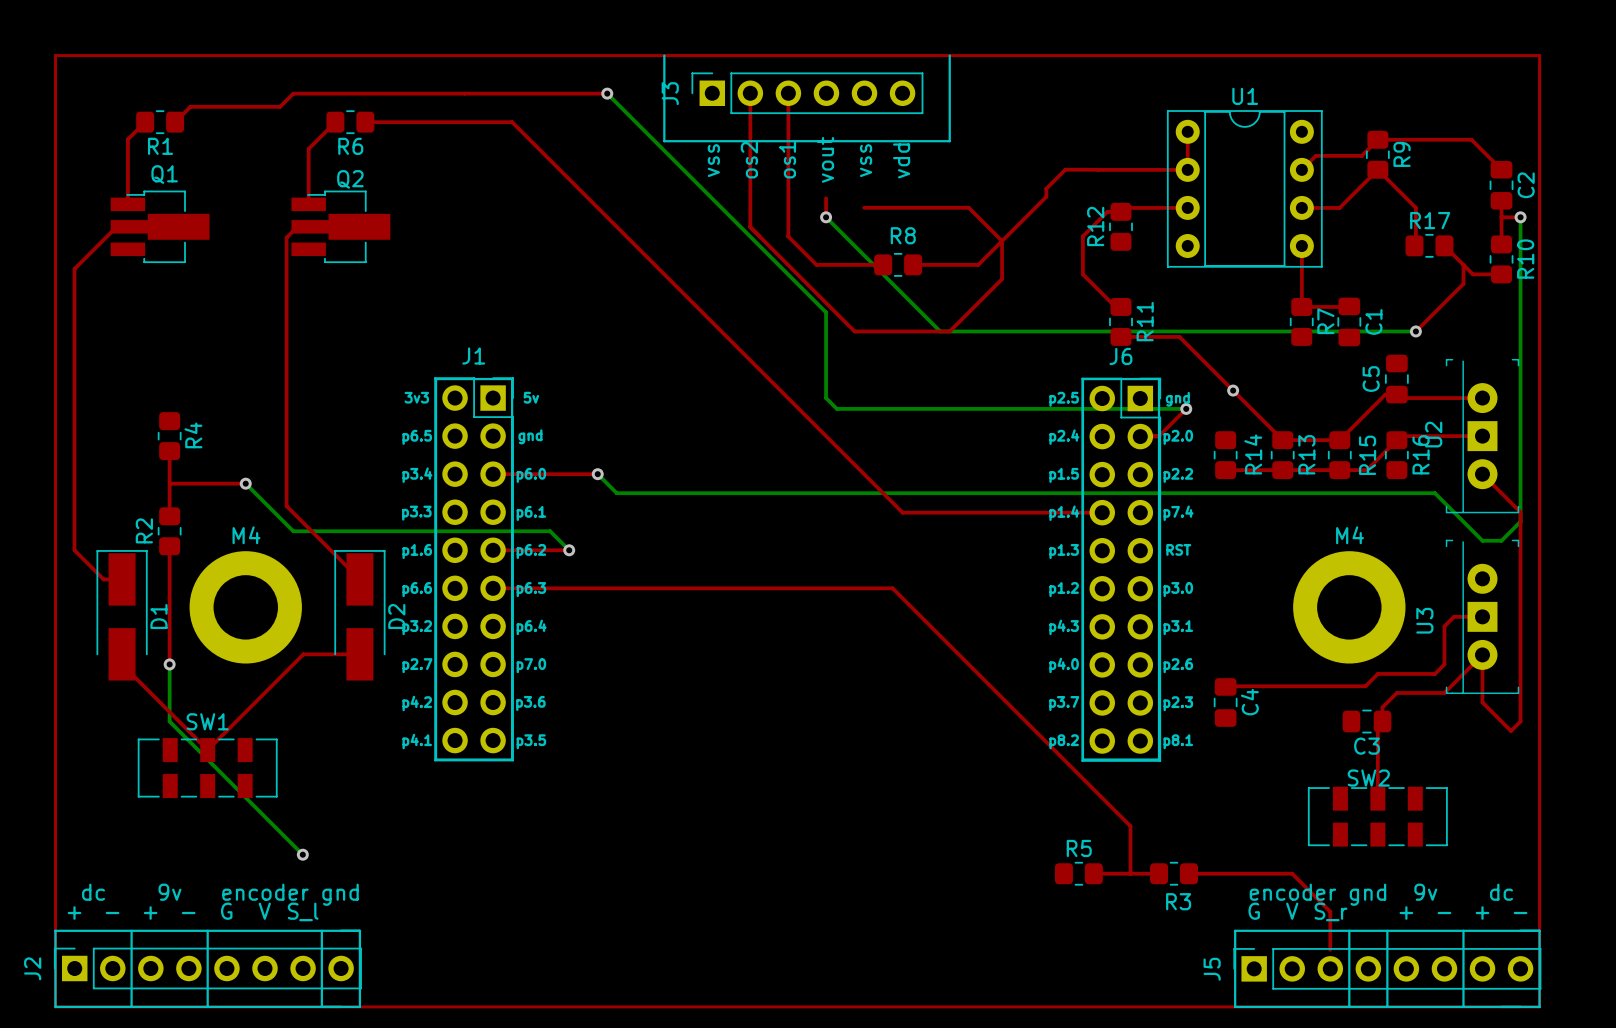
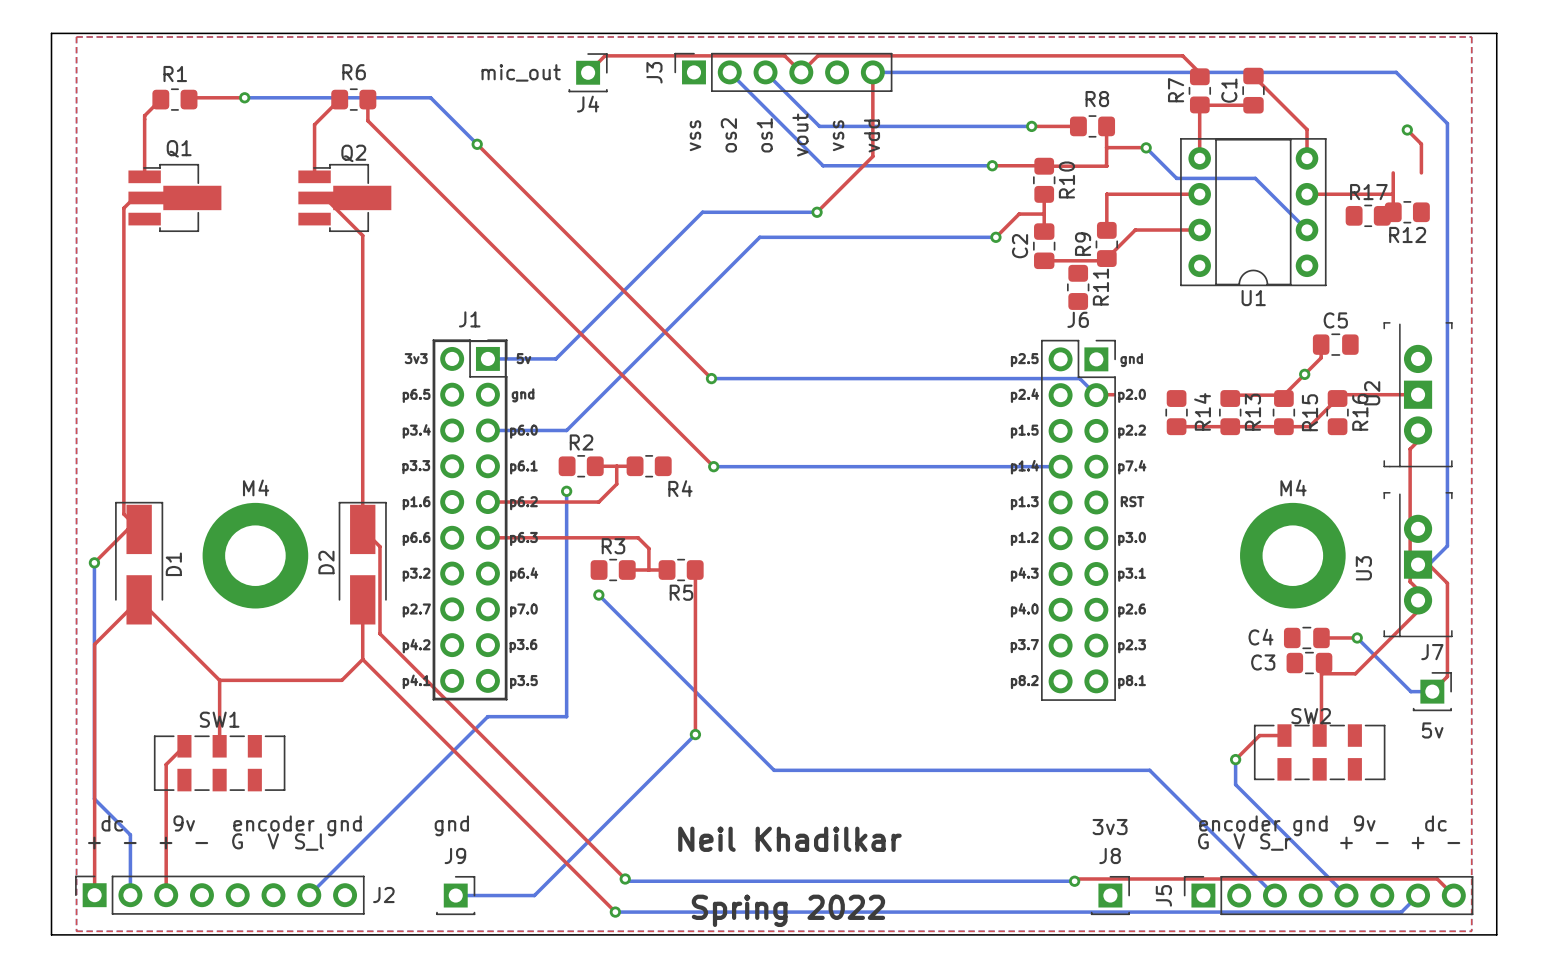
board edge: none -> (51, 33) (1496, 33) (1496, 934) (51, 934) (51, 33)
top track: (55, 55) (1539, 55) (1539, 1006) (55, 1006) (55, 55) -> none
line: (664, 55) (664, 141) (949, 141) (949, 55) -> none
text: none -> mic_out (521, 72)
top track: none -> (588, 72) (605, 55) (784, 55) (801, 72) (817, 55) (1182, 55) (1199, 72) (1199, 76)
J4: none -> (588, 72)
top track: (607, 93) (293, 93) (280, 106) (190, 106) (175, 122) -> none
bottom track: (607, 93) (826, 312) (826, 398) (836, 408) (1187, 407) -> none
via: (607, 93) -> none
top track: (750, 93) (750, 227) -> none
bottom track: none -> (729, 72) (823, 165) (992, 165)
top track: (788, 93) (788, 236) (816, 264) (883, 264) -> none
bottom track: none -> (765, 72) (819, 126) (1031, 126)
top track: none -> (872, 72) (872, 156) (817, 212)
bottom track: none -> (872, 72) (1396, 72) (1447, 123) (1447, 545) (1428, 564)
top track: none -> (1253, 76) (1307, 129) (1307, 158)
top track: none -> (194, 97) (244, 97)
bottom track: none -> (244, 97) (430, 97) (477, 144)
via: none -> (244, 97)
top track: (365, 122) (512, 122) (902, 512) (1102, 512) -> (367, 99) (367, 120) (713, 466)
top track: none -> (1199, 104) (1253, 105)
top track: none -> (1199, 105) (1199, 158)
top track: (1187, 131) (1187, 169) (1098, 169) -> none
R1 name position: R1 (160, 146) -> R1 (175, 74)
R6 name position: R6 (350, 146) -> R6 (354, 72)
top track: none -> (1031, 126) (1078, 126)
via: none -> (1031, 126)
top track: none -> (1106, 126) (1106, 166) (992, 165)
R9 position: (1377, 154) -> (1106, 244)
R9 name position: R9 (1402, 154) -> R9 (1083, 244)
top track: none -> (1407, 129) (1421, 144) (1421, 172)
top track: none -> (477, 144) (711, 378)
via: none -> (477, 144)
top track: (1097, 169) (1065, 169) (1046, 188) (1046, 196) (978, 264) (913, 264) -> none
top track: (1501, 169) (1471, 139) (1377, 139) (1361, 155) (1315, 155) (1301, 169) -> none
top track: none -> (1106, 147) (1146, 147)
bottom track: none -> (1146, 147) (1176, 178) (1255, 178) (1307, 230)
via: none -> (1146, 147)
C2 position: (1501, 185) -> (1044, 246)
C2 name position: C2 (1526, 185) -> C2 (1020, 246)
U1 rotation: 0° (1244, 188) -> 180° (1253, 212)
via: none -> (992, 165)
top track: (826, 198) (826, 217) -> none
top track: none -> (1393, 172) (1393, 212)
top track: (1501, 200) (1501, 244) -> none
top track: (864, 207) (968, 207) (1002, 241) (1002, 279) (949, 331) (854, 331) (749, 226) -> none
top track: (1187, 207) (1124, 207) (1120, 211) (1107, 211) (1082, 236) (1082, 274) (1115, 306) (1120, 306) -> none
top track: (1301, 207) (1339, 207) (1377, 169) (1415, 207) (1414, 245) -> none
bottom track: (826, 217) (940, 331) (1415, 331) -> none
via position: (826, 217) -> (817, 212)
top track: (1501, 217) (1520, 217) -> none
bottom track: (1520, 217) (1520, 521) (1501, 540) (1482, 540) (1434, 493) (616, 493) (597, 474) -> none
via position: (1520, 217) -> (1407, 129)
top track: none -> (1106, 194) (1199, 194)
top track: none -> (1307, 194) (1393, 194)
top track: none -> (1044, 194) (1044, 231)
top track: none -> (1106, 194) (1106, 230)
top track: (309, 226) (297, 226) (286, 237) (286, 506) (359, 579) -> (315, 197) (325, 197) (362, 235) (362, 529) (379, 546) (379, 633) (625, 879)
R12 name position: R12 (1095, 226) -> R12 (1407, 234)
R12 rotation: 0° (1120, 226) -> 90° clockwise (1407, 212)
R12 position: (1120, 226) -> (1407, 212)
top track: (105, 237) (74, 269) (74, 550) (103, 579) (110, 579) -> (123, 208) (123, 514) (139, 529)
bottom track: none -> (817, 212) (702, 212) (555, 358) (487, 358)
top track: none -> (1044, 214) (1019, 214) (995, 237)
top track: (1301, 245) (1301, 306) -> none
top track: (1444, 245) (1472, 274) (1501, 274) -> none
R10 position: (1501, 259) -> (1044, 180)
top track: none -> (1199, 230) (1135, 230) (1104, 260) (1044, 260)
R8 position: (898, 264) -> (1092, 126)
top track: (1463, 264) (1463, 283) (1415, 331) -> none
bottom track: none -> (995, 237) (759, 237) (566, 430) (487, 430)
via: none -> (995, 237)
top track: (1349, 306) (1301, 306) -> none
R7 position: (1301, 321) -> (1199, 90)
R7 name position: R7 (1325, 321) -> R7 (1176, 90)
C1 position: (1349, 321) -> (1253, 90)
C1 name position: C1 (1373, 321) -> C1 (1229, 90)
via: (1415, 331) -> none
top track: (1120, 336) (1179, 336) (1282, 440) (1339, 440) (1385, 394) (1396, 394) (1400, 398) (1482, 398) -> none
line: (1082, 379) (1159, 379) (1159, 759) (1082, 759) (1082, 379) -> none
C5 rotation: 0° (1396, 379) -> 90° clockwise (1335, 344)
top track: none -> (1321, 344) (1321, 357) (1283, 395) (1230, 395)
via: (1233, 390) -> none
top track: (1186, 408) (1158, 436) (1140, 436) -> none
via: (1186, 408) -> none
via: none -> (1304, 374)
bottom track: none -> (711, 378) (1079, 378) (1096, 395)
via: none -> (711, 378)
R4 rotation: 0° (169, 436) -> 90° clockwise (649, 466)
R4 position: (169, 436) -> (649, 466)
top track: (169, 451) (169, 516) -> none
top track: (493, 474) (597, 474) -> none
via: (597, 474) -> none
top track: (1482, 474) (1520, 512) (1520, 721) (1511, 731) (1482, 702) (1482, 654) (1444, 692) (1396, 692) (1382, 707) (1382, 721) (1377, 726) (1377, 798) -> none
top track: none -> (1428, 430) (1410, 449) (1410, 581) (1428, 600) (1355, 673) (1321, 673) (1321, 735)
top track: (169, 483) (245, 483) -> none
bottom track: (245, 483) (293, 531) (550, 531) (569, 550) -> none
via: (245, 483) -> none
top track: none -> (595, 466) (635, 466)
top track: none -> (616, 466) (616, 484) (598, 502) (559, 502)
bottom track: none -> (713, 466) (1060, 466)
via: none -> (713, 466)
R2 rotation: 0° (169, 531) -> 90° clockwise (581, 466)
R2 position: (169, 531) -> (581, 466)
bottom track: none -> (566, 491) (566, 716) (487, 716) (309, 895)
top track: (169, 546) (169, 664) -> none
via position: (569, 550) -> (566, 491)
top track: none -> (127, 529) (94, 562)
top track: (652, 588) (892, 588) (1130, 826) (1130, 873) -> (638, 537) (648, 548) (648, 570)
bottom track: none -> (94, 562) (94, 798) (130, 834) (130, 895)
via: none -> (94, 562)
D2 name position: D2 (396, 616) -> D2 (326, 562)
top track: (1482, 616) (1453, 616) (1444, 626) (1444, 664) (1434, 673) (1377, 673) (1365, 686) (1225, 686) -> none
top track: none -> (1428, 564) (1447, 583) (1447, 676) (1432, 691)
top track: none -> (627, 570) (667, 570)
top track: none -> (695, 570) (695, 734)
bottom track: none -> (598, 595) (774, 770) (1149, 770) (1274, 895)
via: none -> (598, 595)
top track: (122, 654) (122, 664) (207, 750) (303, 654) (359, 654) -> (362, 659) (362, 599)
bottom track: (169, 664) (169, 721) (302, 854) -> none
via: (169, 664) -> none
top track: none -> (1321, 637) (1357, 637)
bottom track: none -> (1357, 637) (1410, 691) (1432, 691)
via: none -> (1357, 637)
C4 rotation: 0° (1225, 702) -> 90° clockwise (1306, 637)
C4 position: (1225, 702) -> (1306, 637)
C4 name position: C4 (1249, 702) -> C4 (1260, 637)
top track: none -> (362, 659) (341, 680) (219, 680)
top track: none -> (362, 659) (615, 912)
top track: none -> (219, 680) (219, 746)
top track: none -> (219, 680) (139, 599) (94, 644) (94, 895)
C3 name position: C3 (1366, 746) -> C3 (1263, 662)
J7: none -> (1432, 691)
SW1 position: (207, 768) -> (219, 763)
text: none -> 5v (1432, 730)
bottom track: none -> (695, 734) (534, 895) (455, 895)
via: none -> (695, 734)
top track: none -> (1286, 735) (1259, 735) (1235, 759)
top track: none -> (184, 746) (166, 764) (166, 895)
bottom track: none -> (1235, 759) (1235, 784) (1346, 895)
via: none -> (1235, 759)
R5 name position: R5 (1079, 848) -> R5 (681, 592)
via: (302, 854) -> none
R5 position: (1078, 873) -> (681, 570)
top track: (1093, 873) (1159, 873) -> none
R3 position: (1174, 873) -> (613, 570)
top track: (1189, 873) (1292, 873) (1330, 911) (1330, 949) -> none
text: none -> gnd (451, 825)
text: none -> 3v3 (1110, 827)
R3 name position: R3 (1178, 901) -> R3 (613, 546)
text: none -> Neil Khadilkar (789, 839)
line: (55, 930) (359, 930) (359, 1006) (55, 1006) (55, 930) -> none
line: (131, 930) (131, 1006) -> none
line: (207, 930) (207, 1006) -> none
line: (321, 930) (321, 1006) -> none
line: (1235, 930) (1539, 930) (1539, 1006) (1235, 1006) (1235, 930) -> none
line: (1349, 930) (1349, 1006) -> none
line: (1387, 930) (1387, 1006) -> none
line: (1463, 930) (1463, 1006) -> none
bottom track: none -> (625, 879) (627, 881) (1074, 881)
via: none -> (625, 879)
top track: none -> (1074, 881) (1076, 879) (1437, 879) (1453, 895)
via: none -> (1074, 881)
J2 name rotation: 0° (32, 968) -> 90° clockwise (383, 895)
J2 name position: J2 (32, 968) -> J2 (383, 895)
J9: none -> (455, 895)
J8: none -> (1110, 895)
bottom track: none -> (1418, 895) (1401, 912) (615, 912)
text: none -> Spring 2022 (788, 910)
via: none -> (615, 912)

